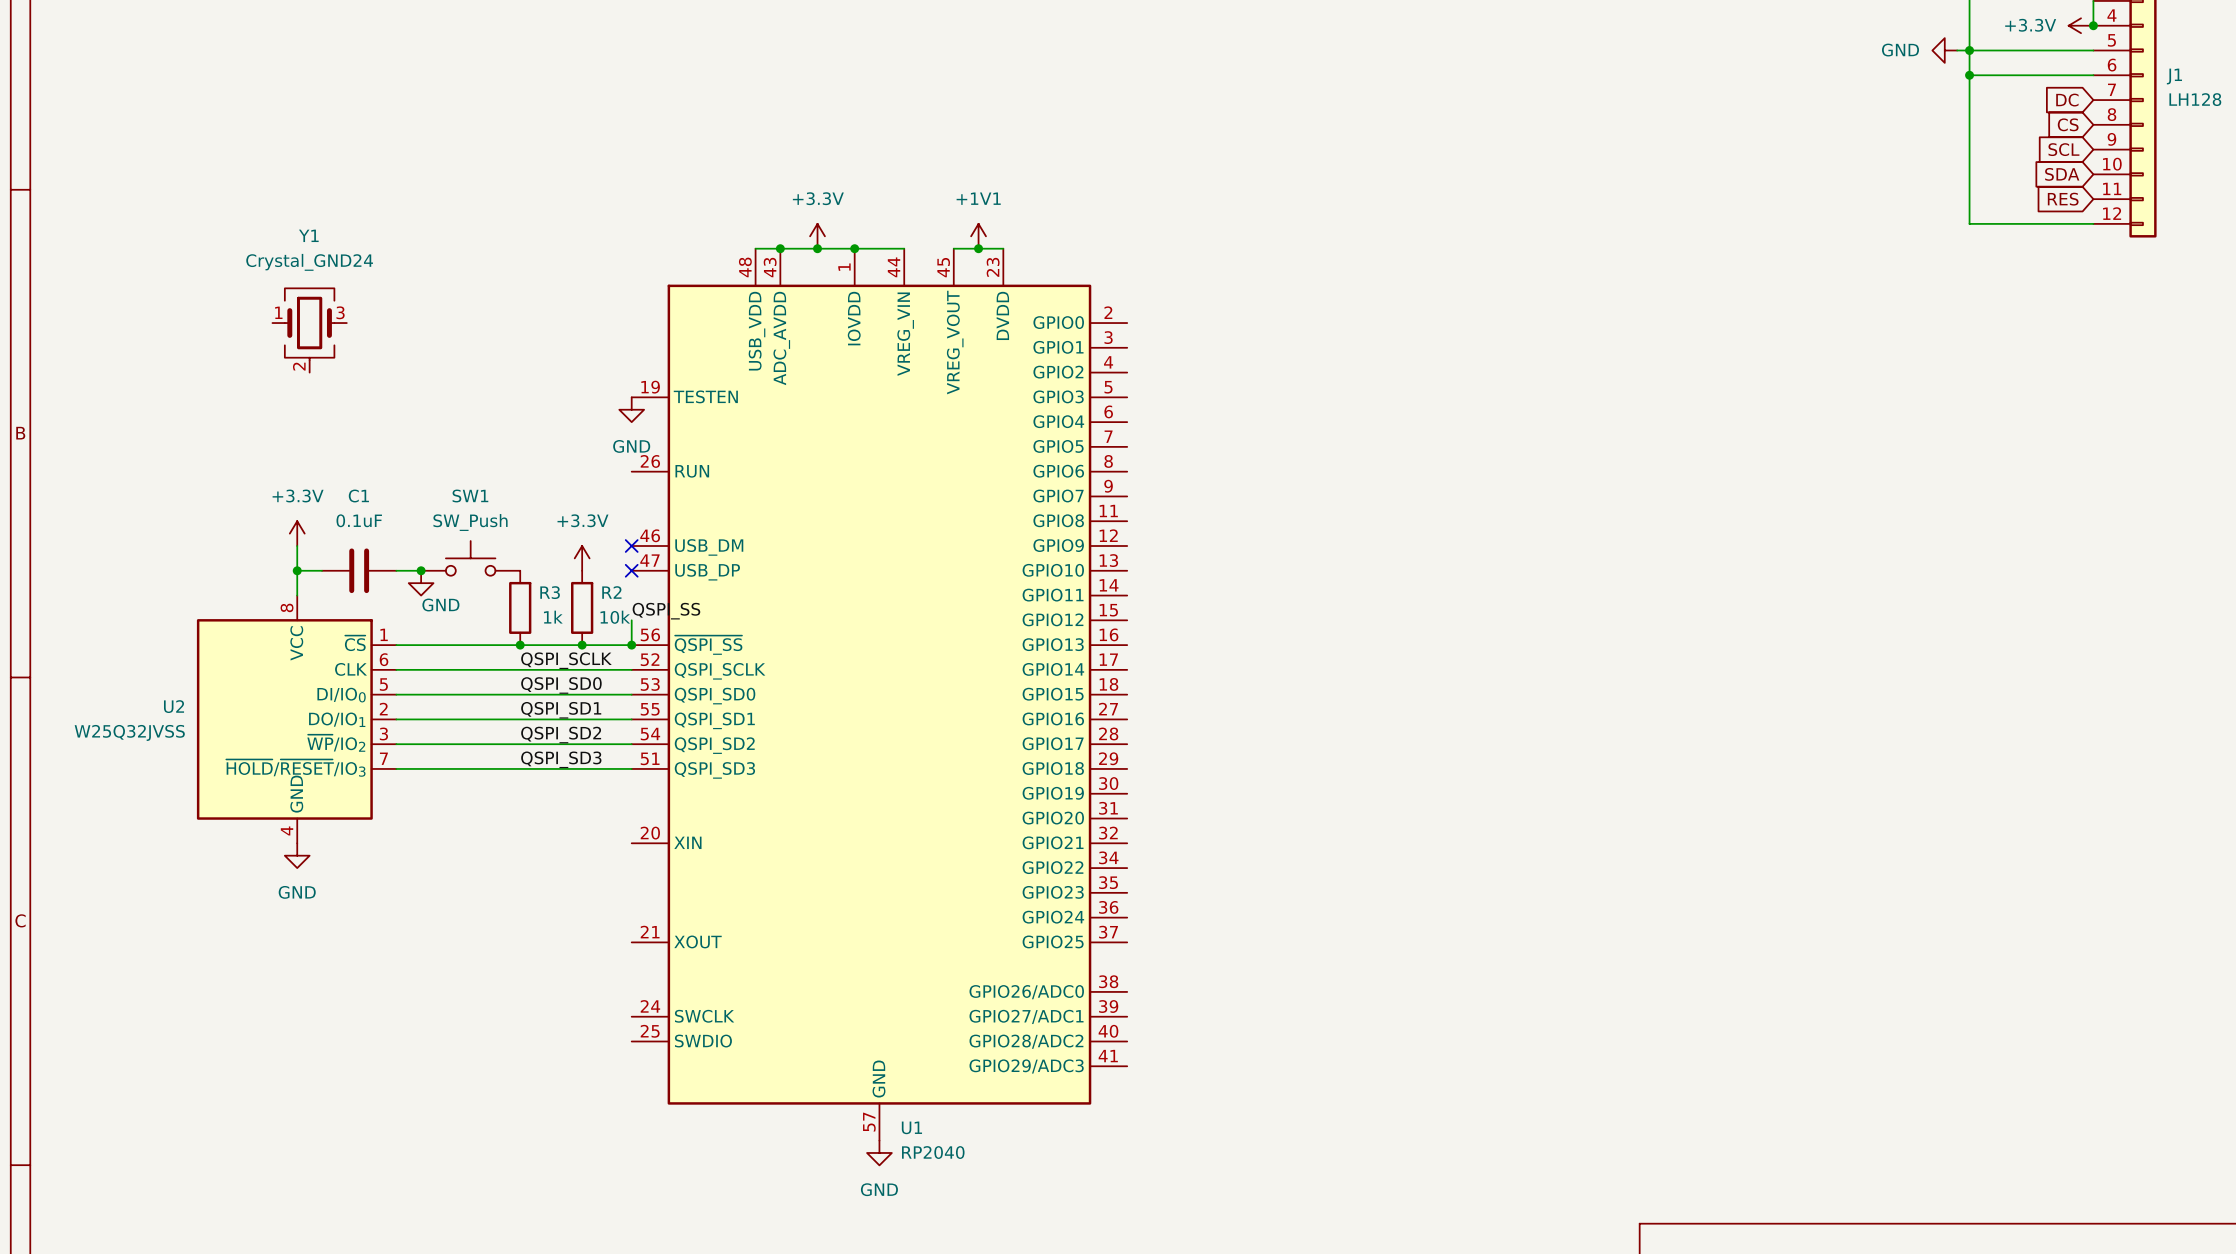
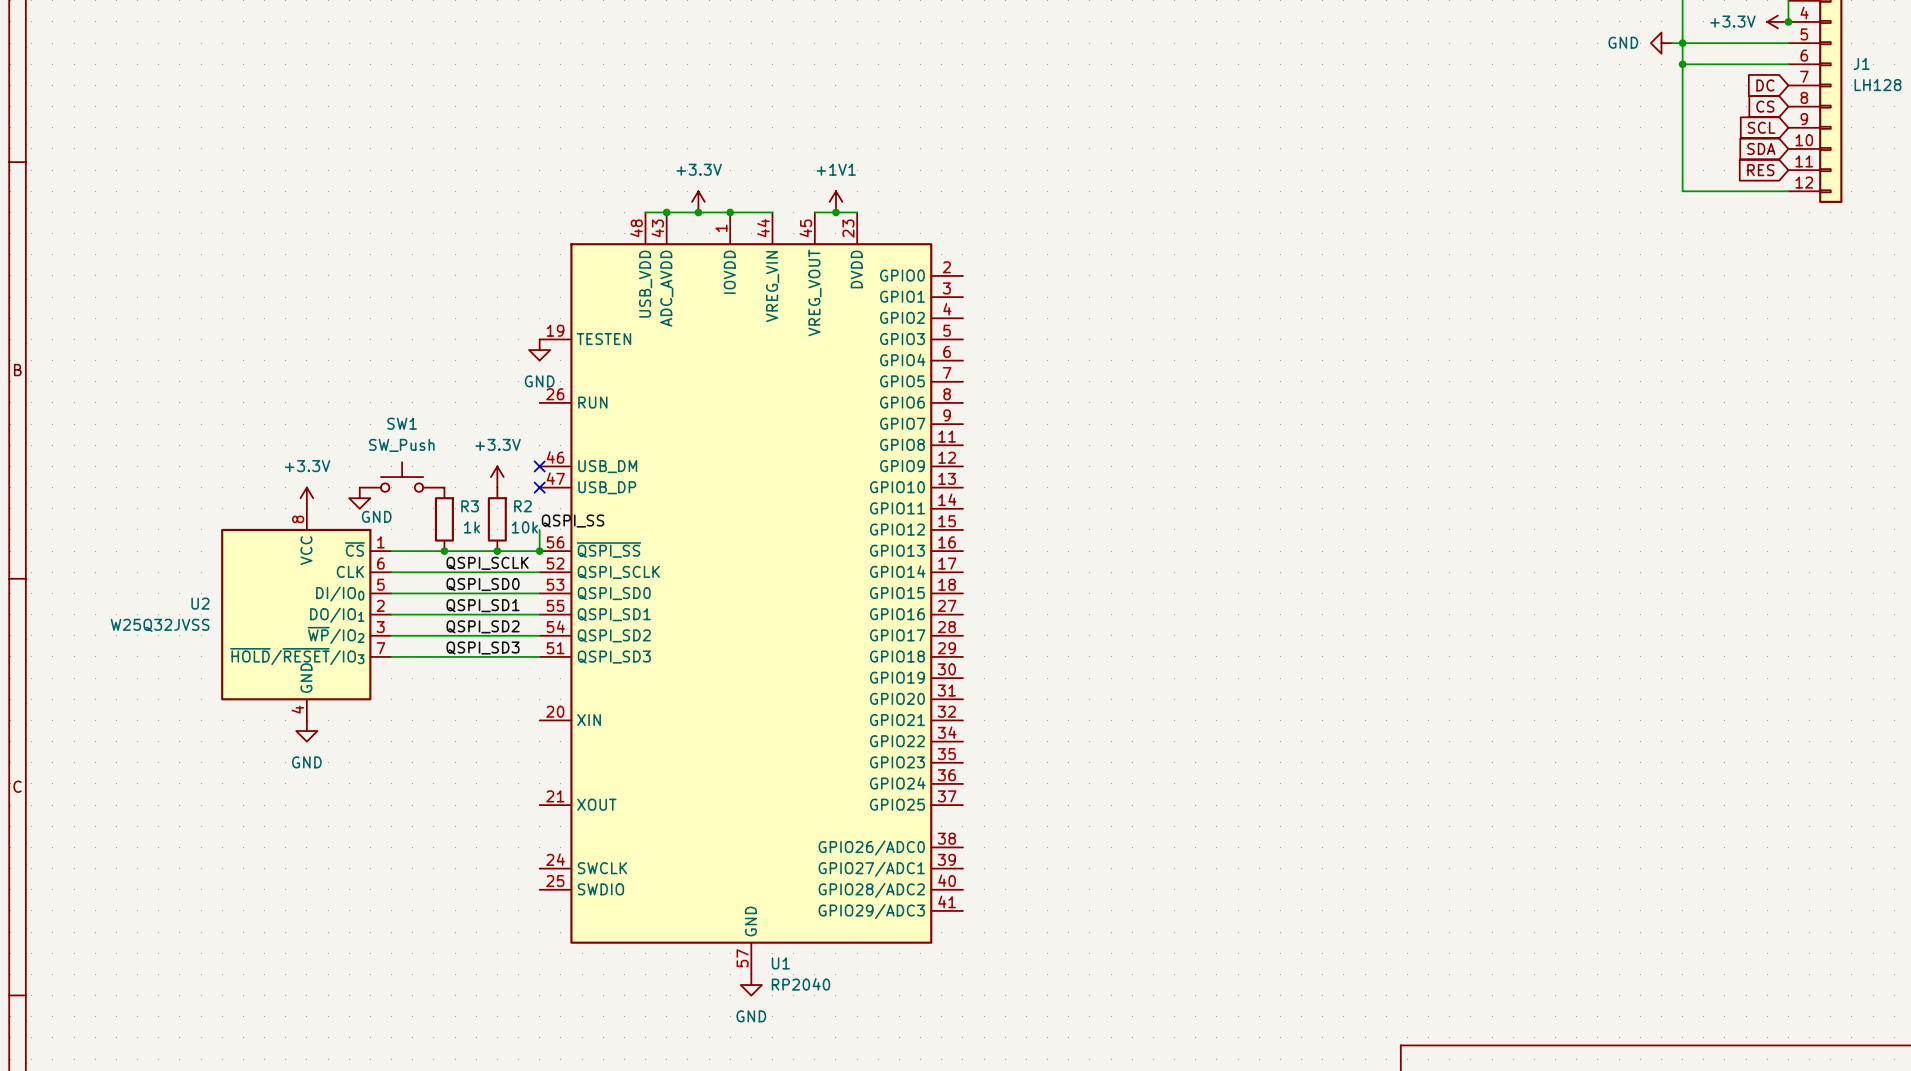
Y1: Crystal_GND24 (309, 330) -> none
power symbol position: +3.3V (297, 533) -> +3.3V (306, 498)
wire: (297, 546) (297, 595) -> none
wire: (297, 570) (322, 570) -> none
junction: (297, 570) -> none
C1: 0.1uF (359, 570) -> none
wire: (396, 570) (421, 570) -> none
junction: (421, 570) -> none
U2 position: (296, 719) -> (306, 614)
power symbol position: GND (297, 855) -> GND (306, 731)

